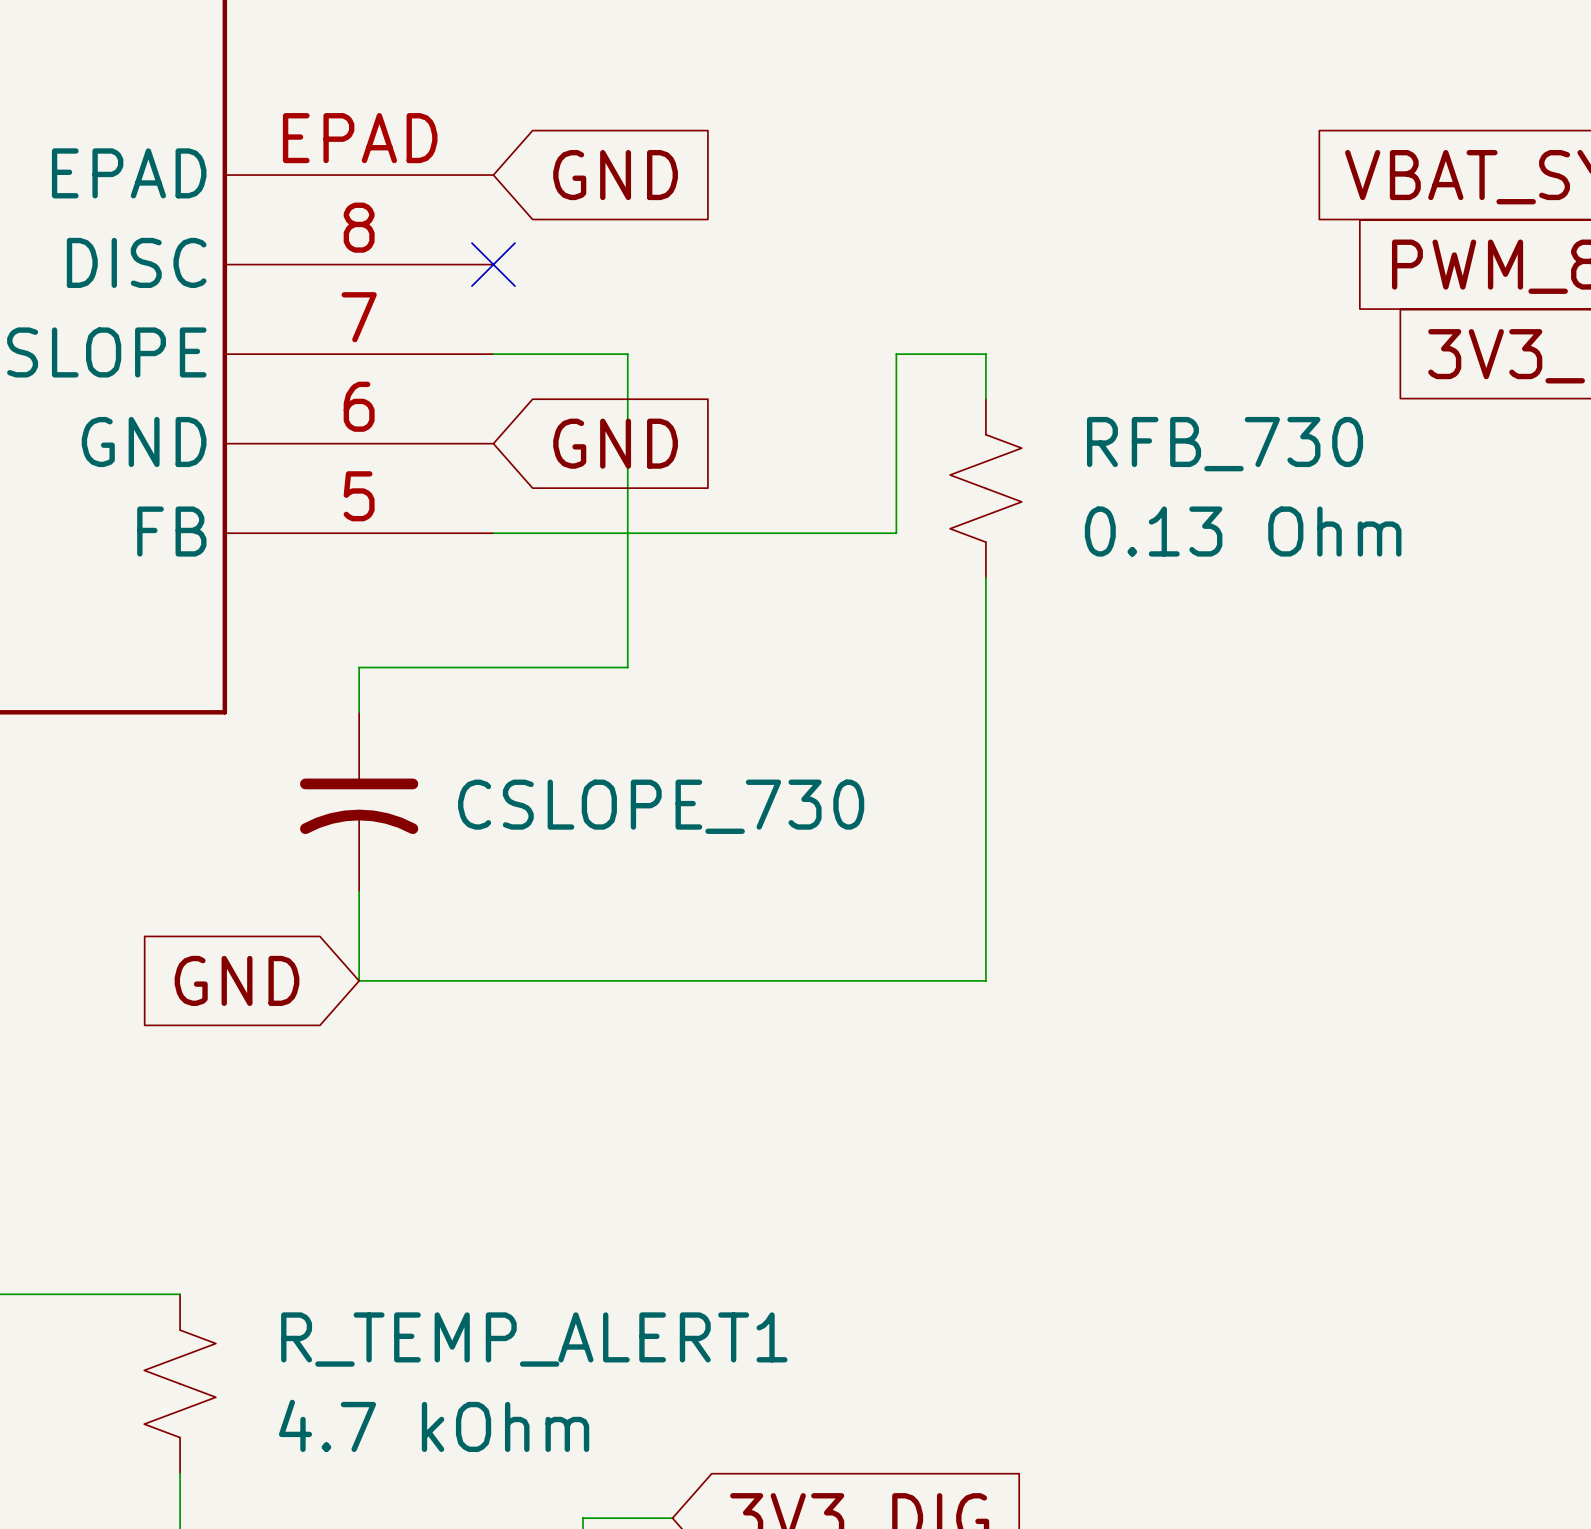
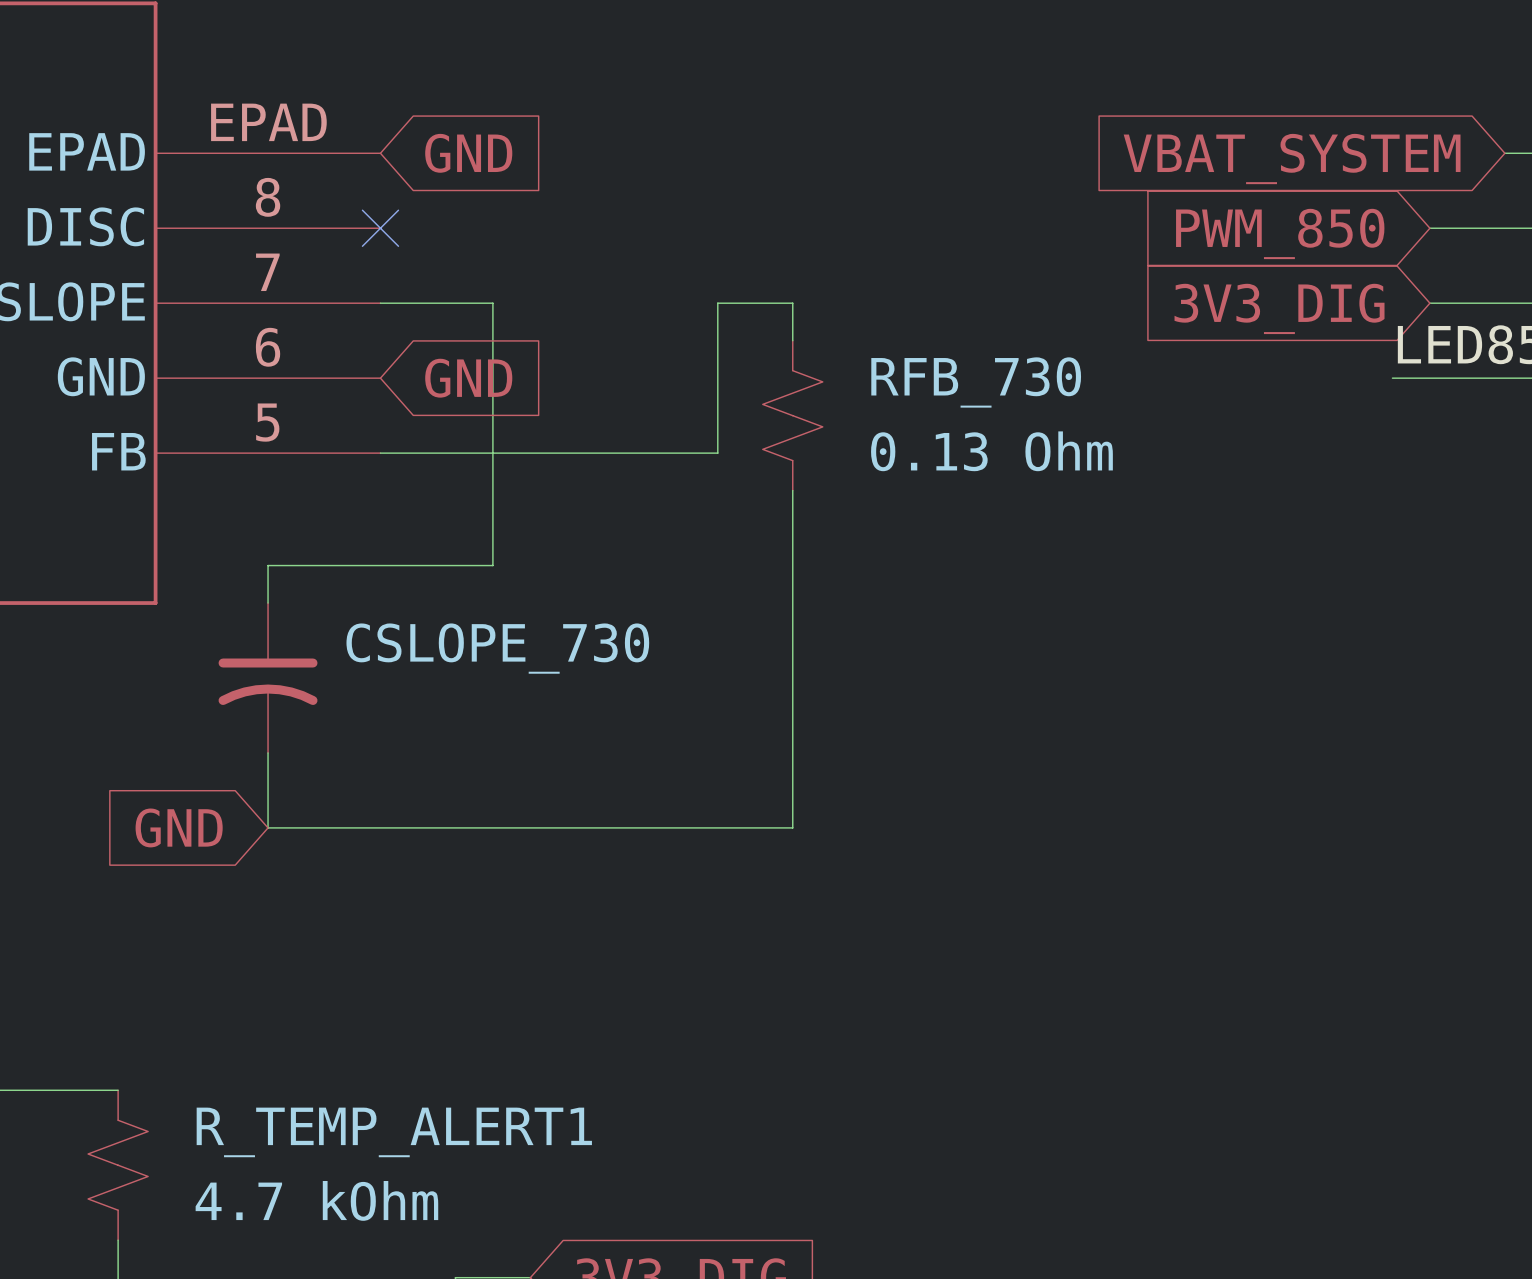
CSLOPE_730 name position: CSLOPE_730 (661, 806) -> CSLOPE_730 (497, 648)

